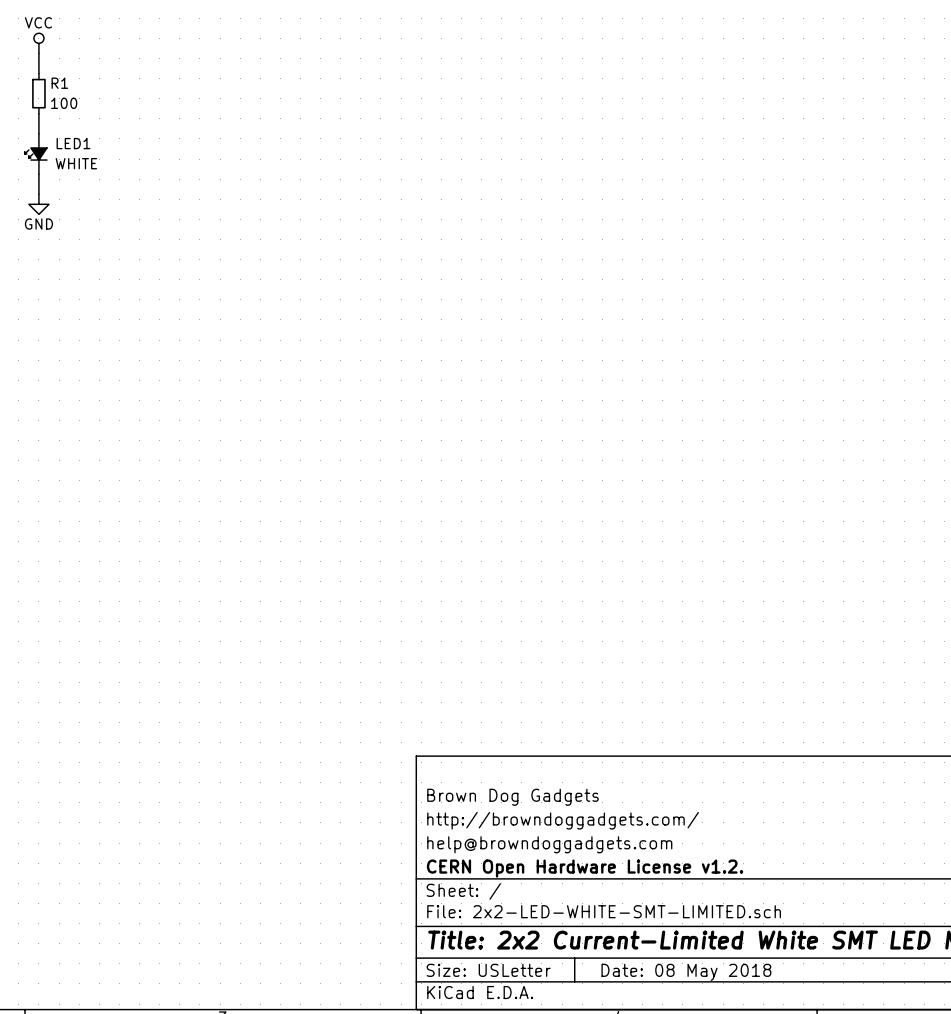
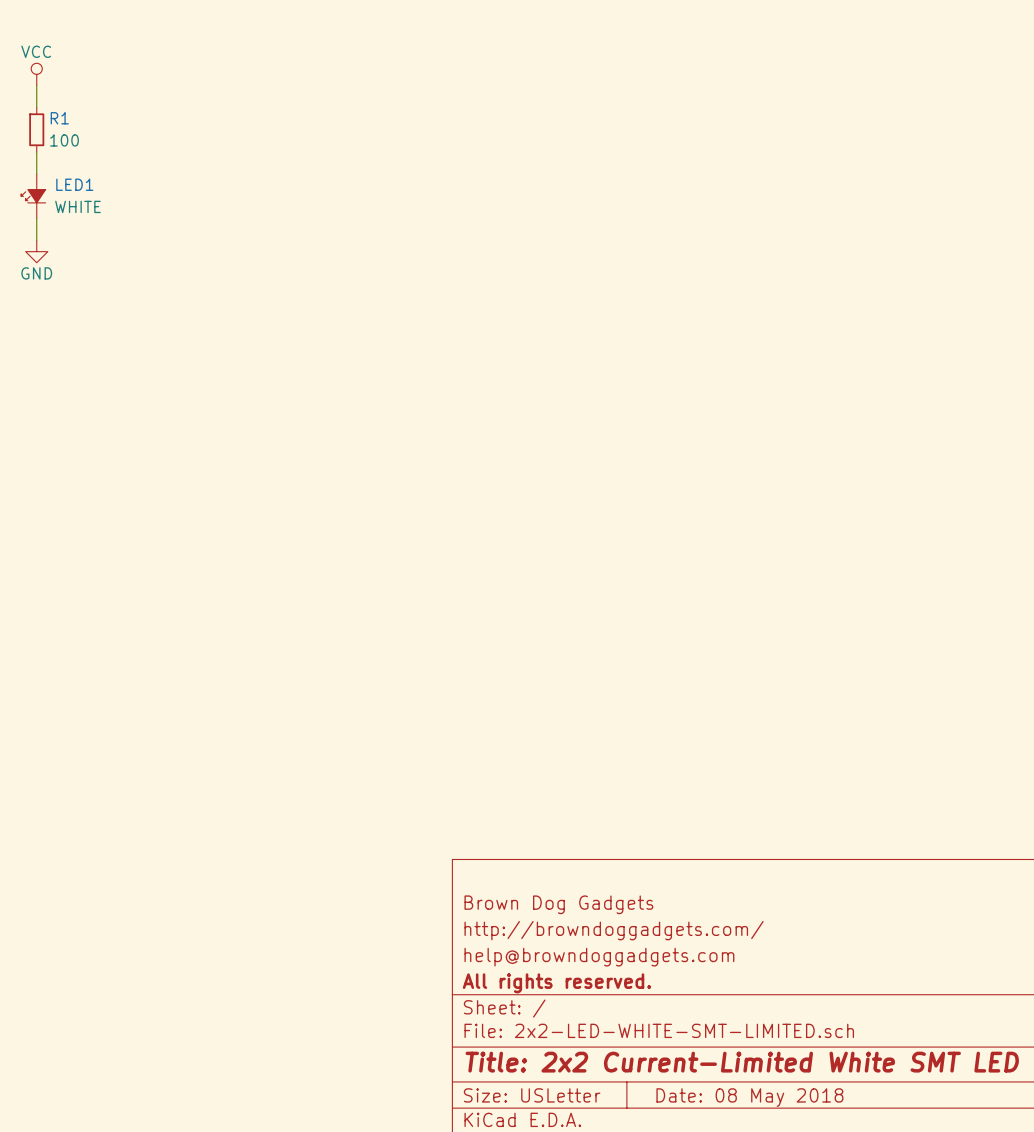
title block: CERN Open Hardware License v1.2. (585, 868) -> All rights reserved. (556, 983)

